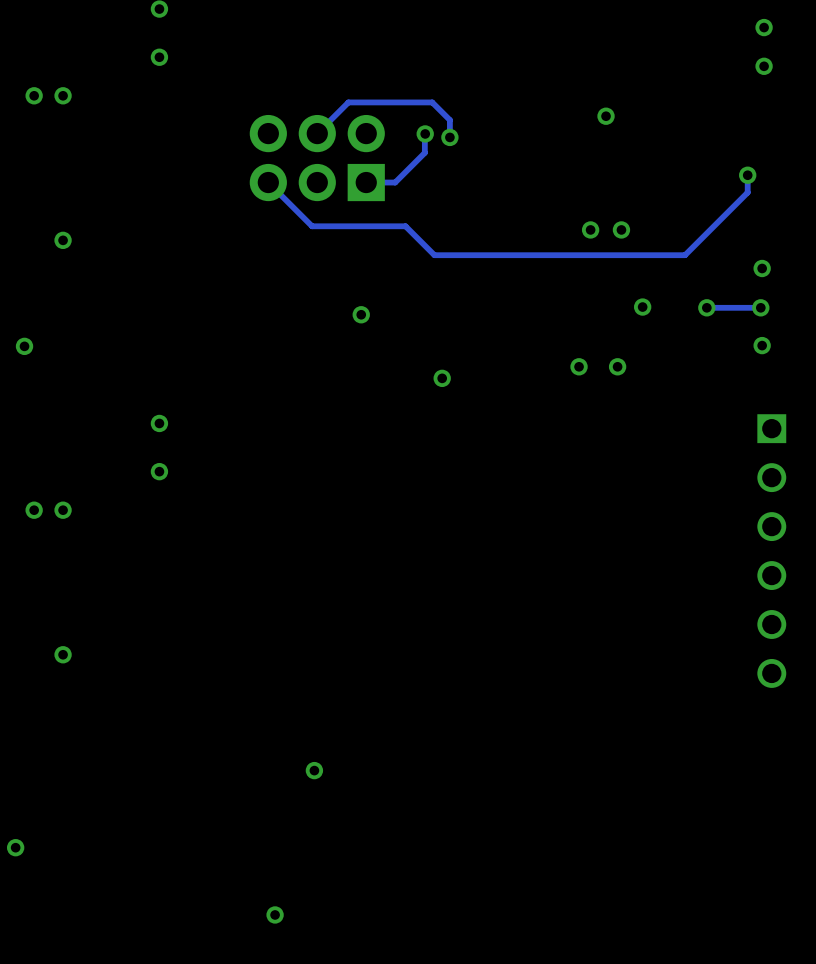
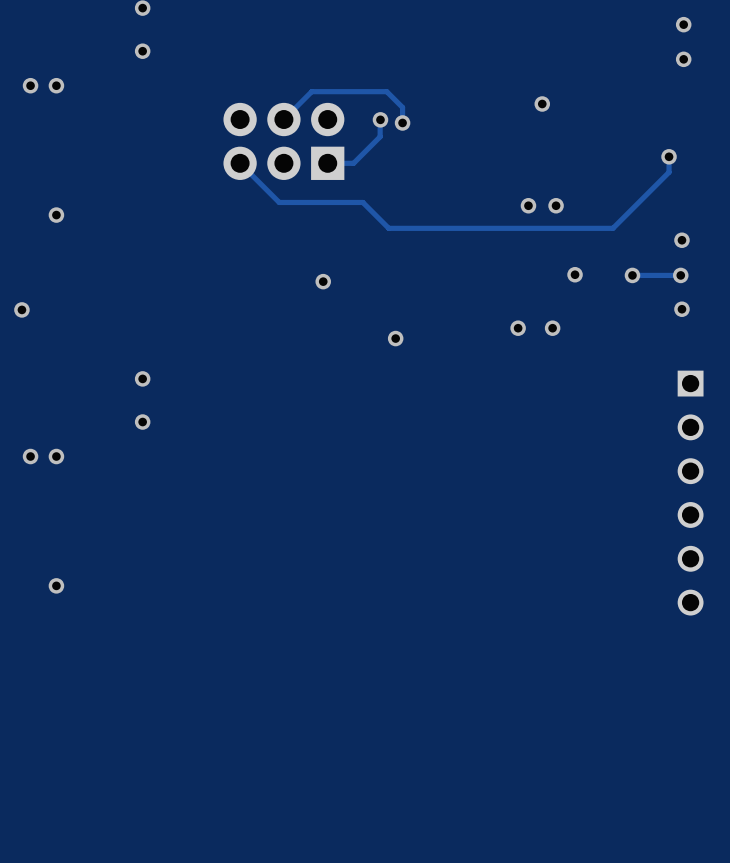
via: (314, 770) -> none
via: (15, 847) -> none
via: (275, 914) -> none

